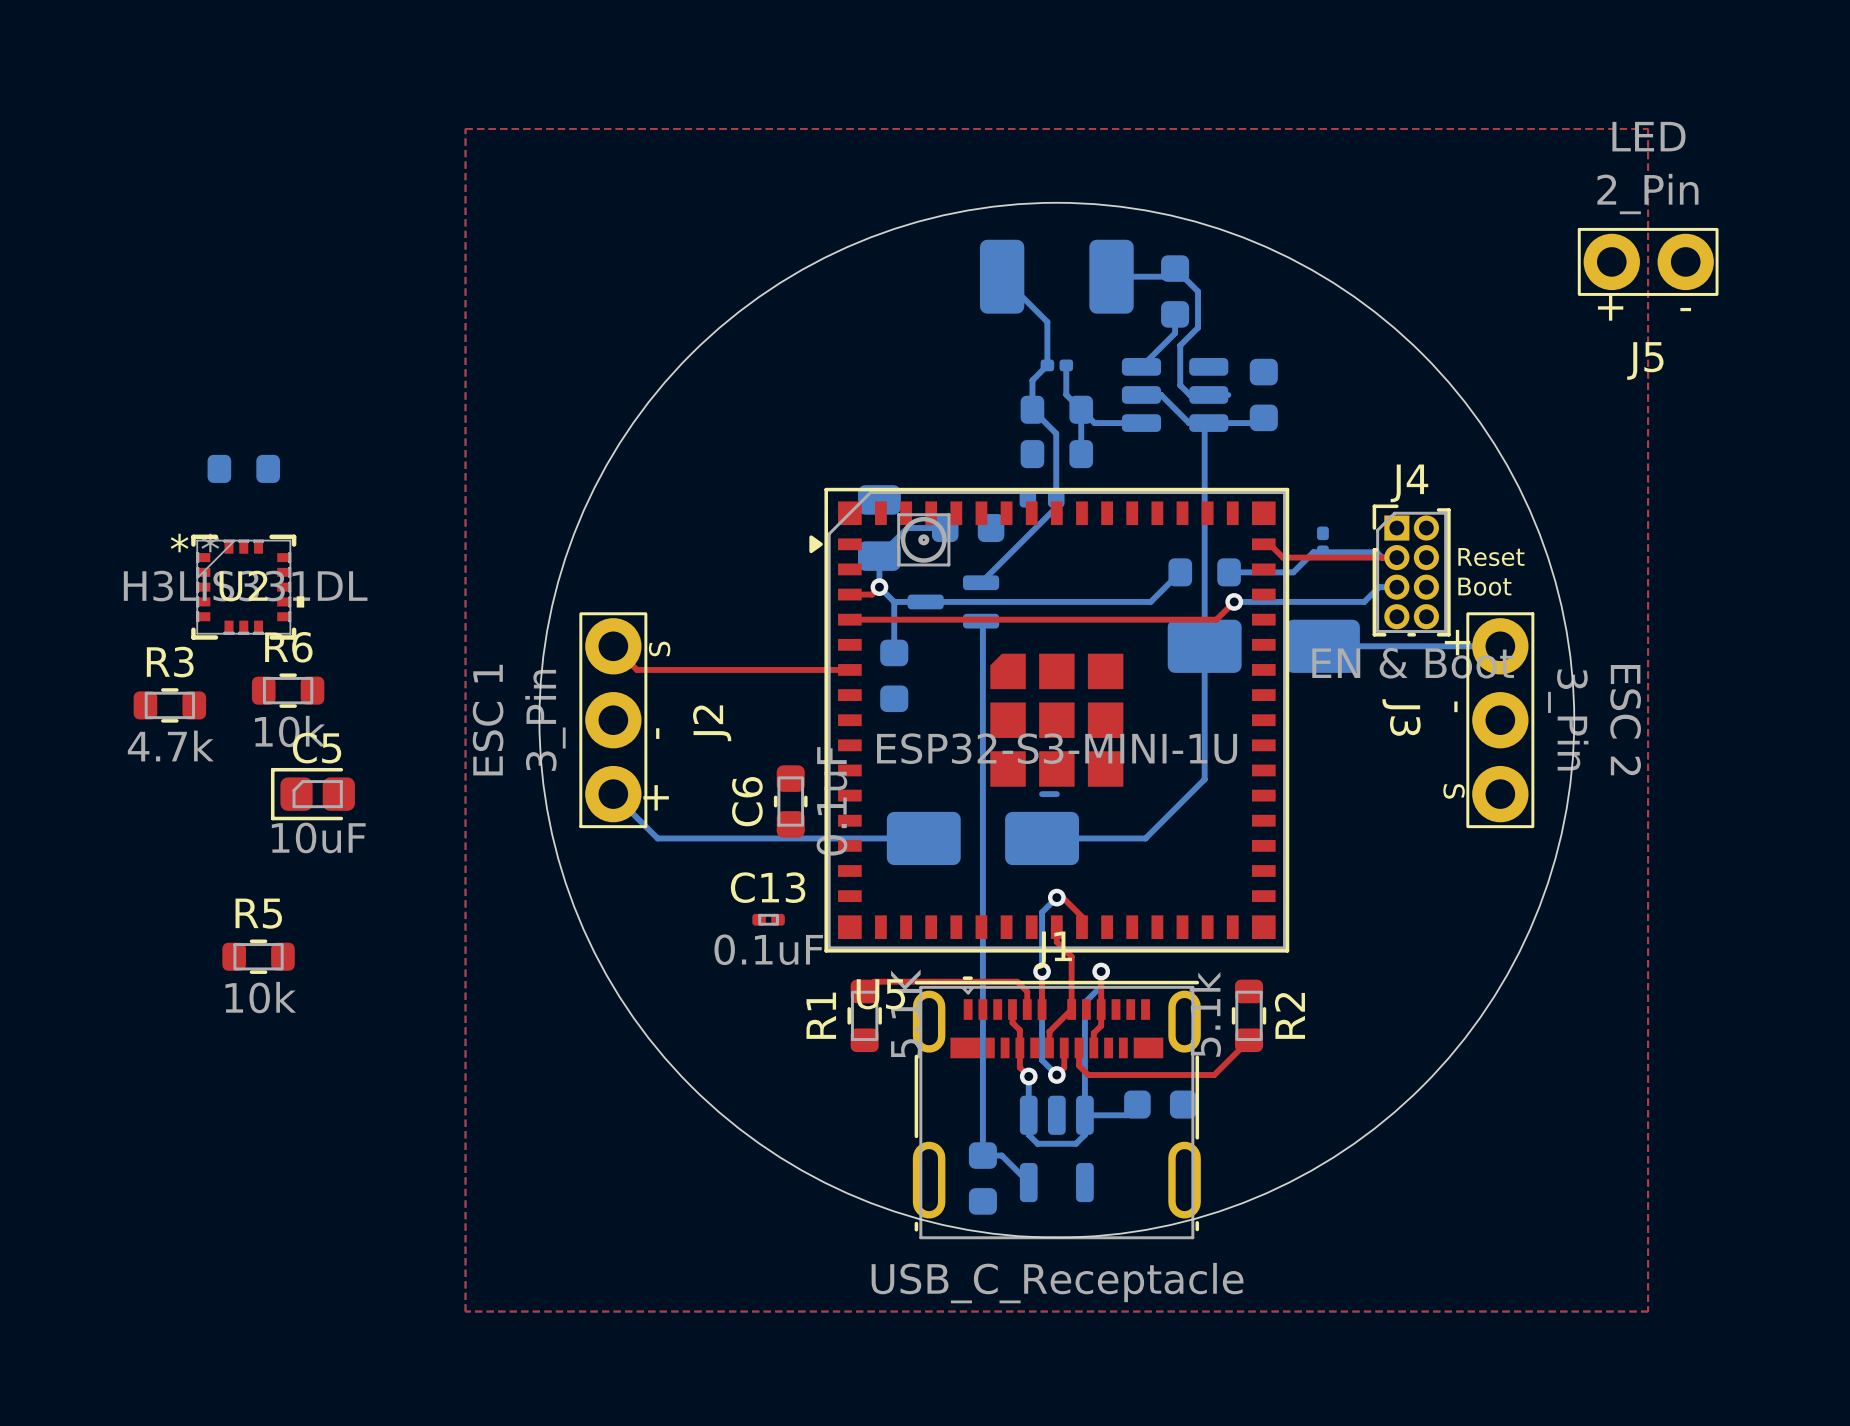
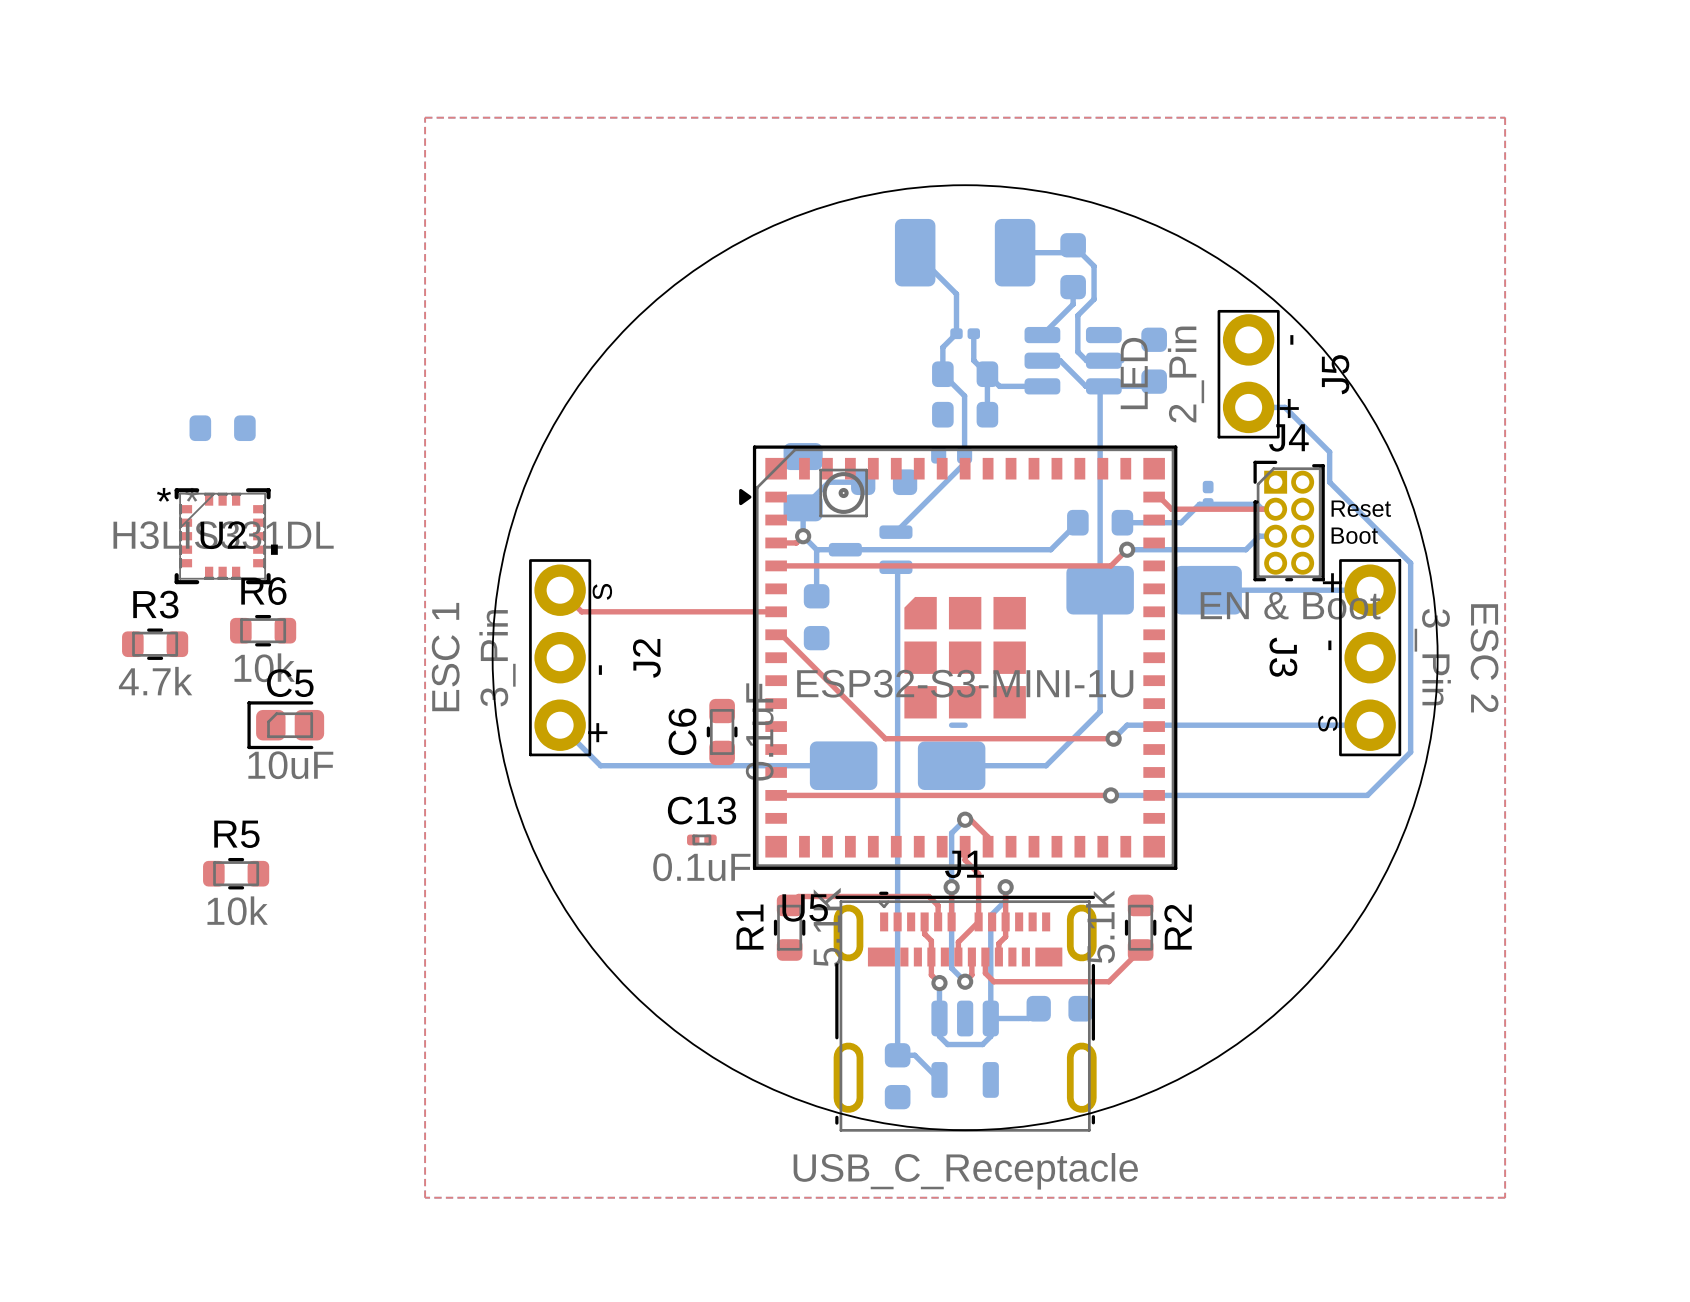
J5 rotation: 0° (1648, 261) -> 90° counterclockwise (1248, 374)
J5 position: (1648, 261) -> (1248, 374)
bottom track: none -> (1248, 407) (1285, 407) (1329, 452) (1329, 482) (1410, 563) (1410, 752) (1367, 795) (1110, 795)
top track: none -> (776, 634) (781, 634) (885, 738) (1113, 738)
bottom track: none -> (1370, 725) (1127, 725) (1113, 738)
via: none -> (1113, 738)
top track: none -> (776, 795) (1110, 795)
via: none -> (1110, 795)

